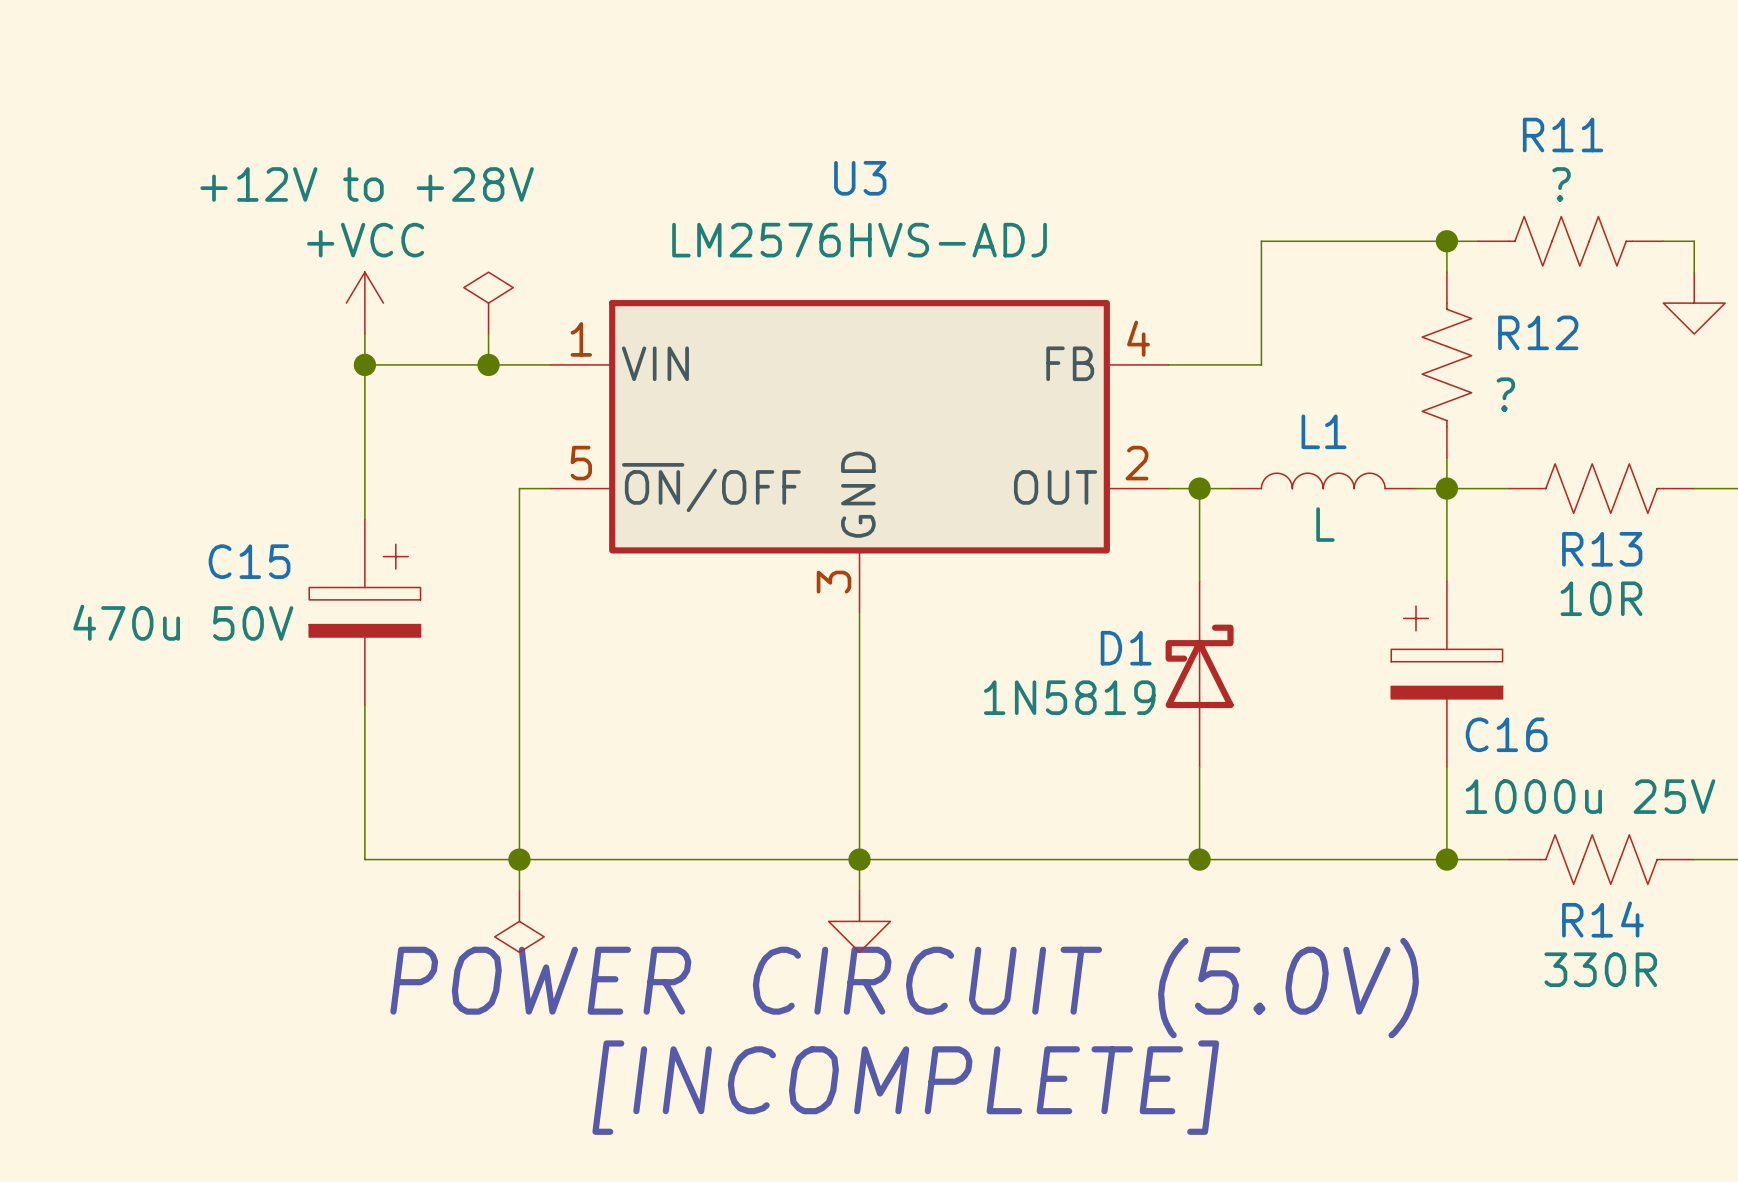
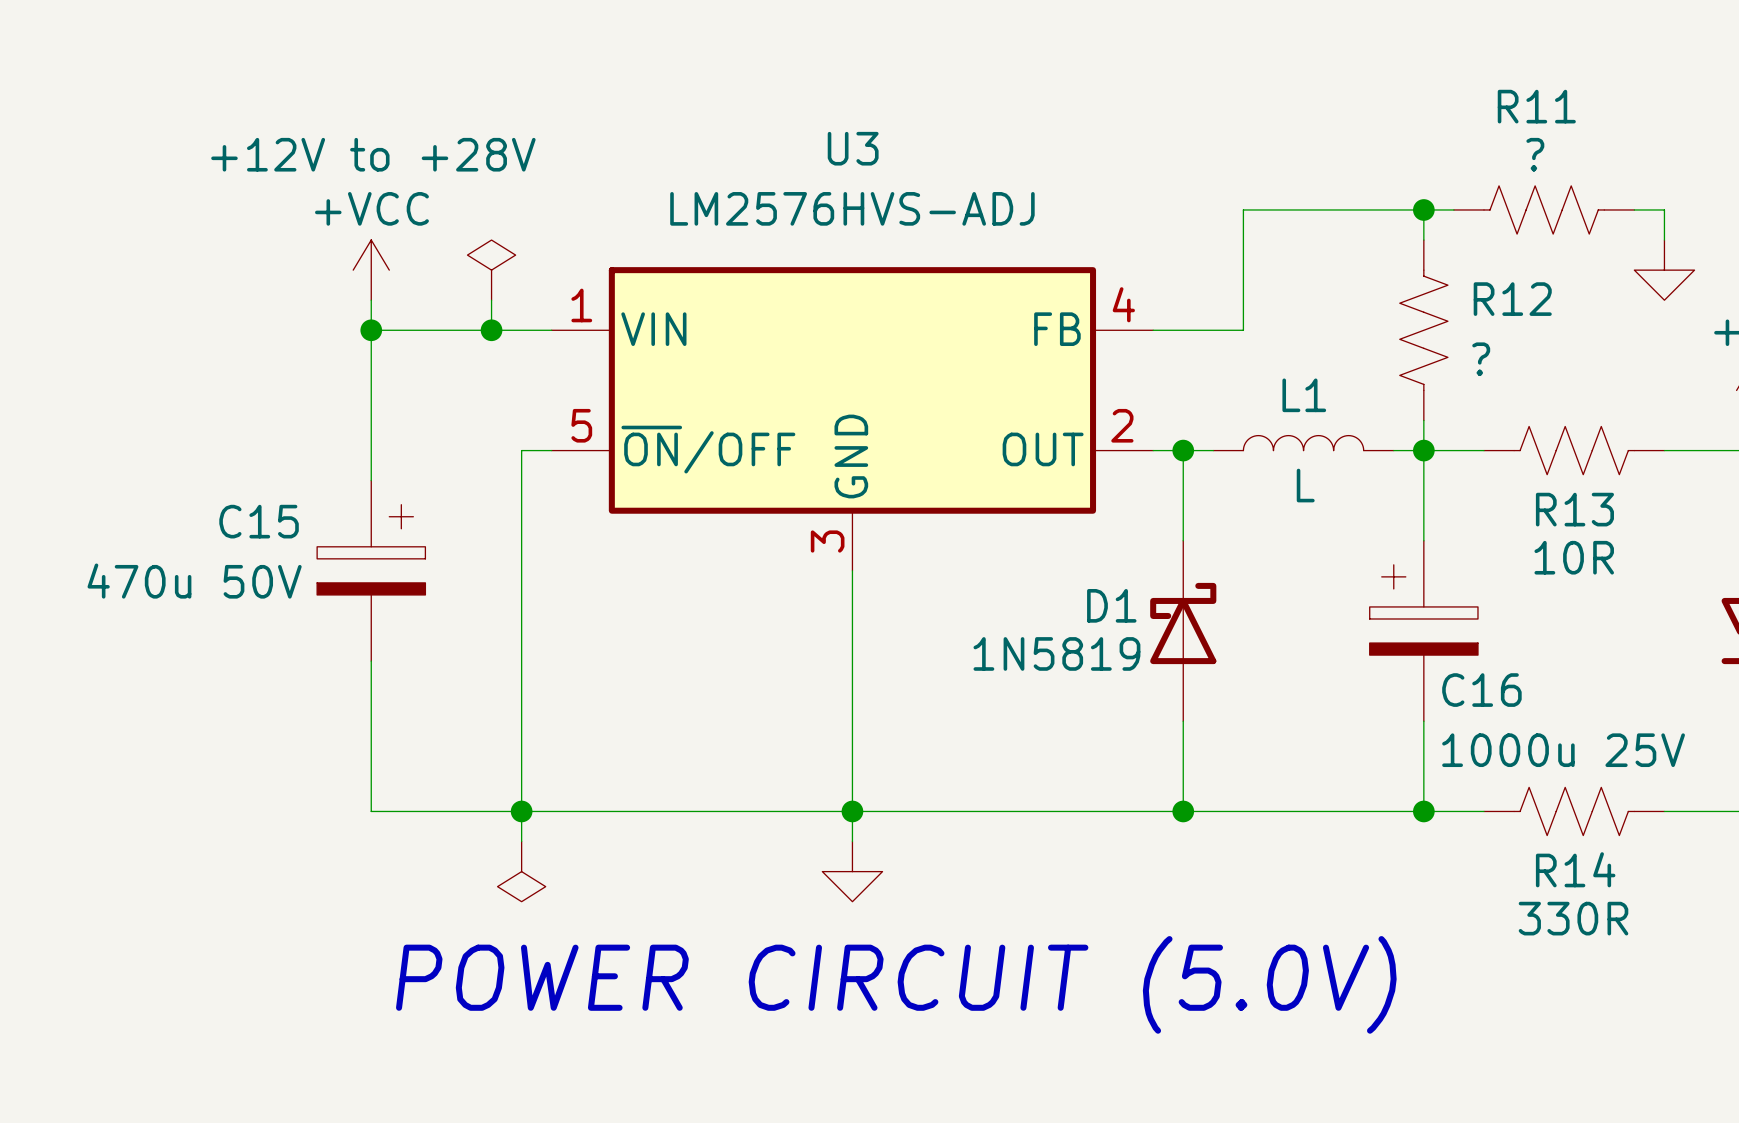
text position: POWER CIRCUIT (5.0V) (904, 988) -> POWER CIRCUIT (5.0V) (896, 984)
text: [INCOMPLETE] (905, 1087) -> none

